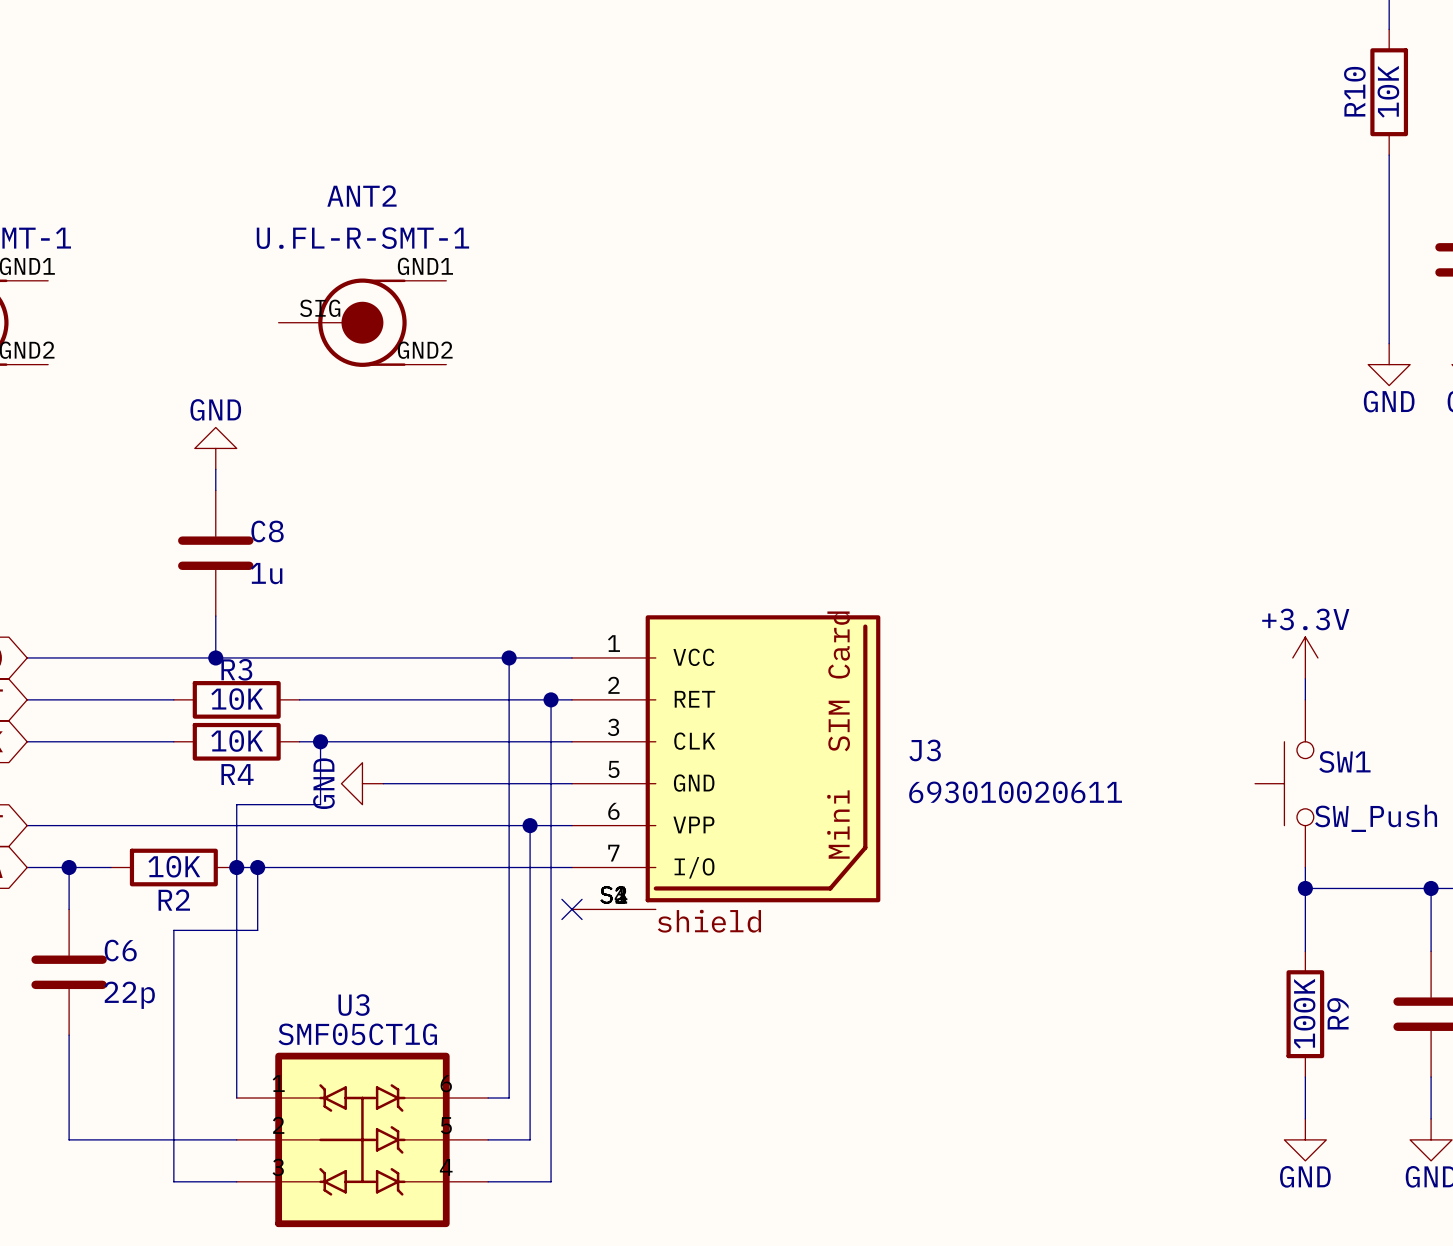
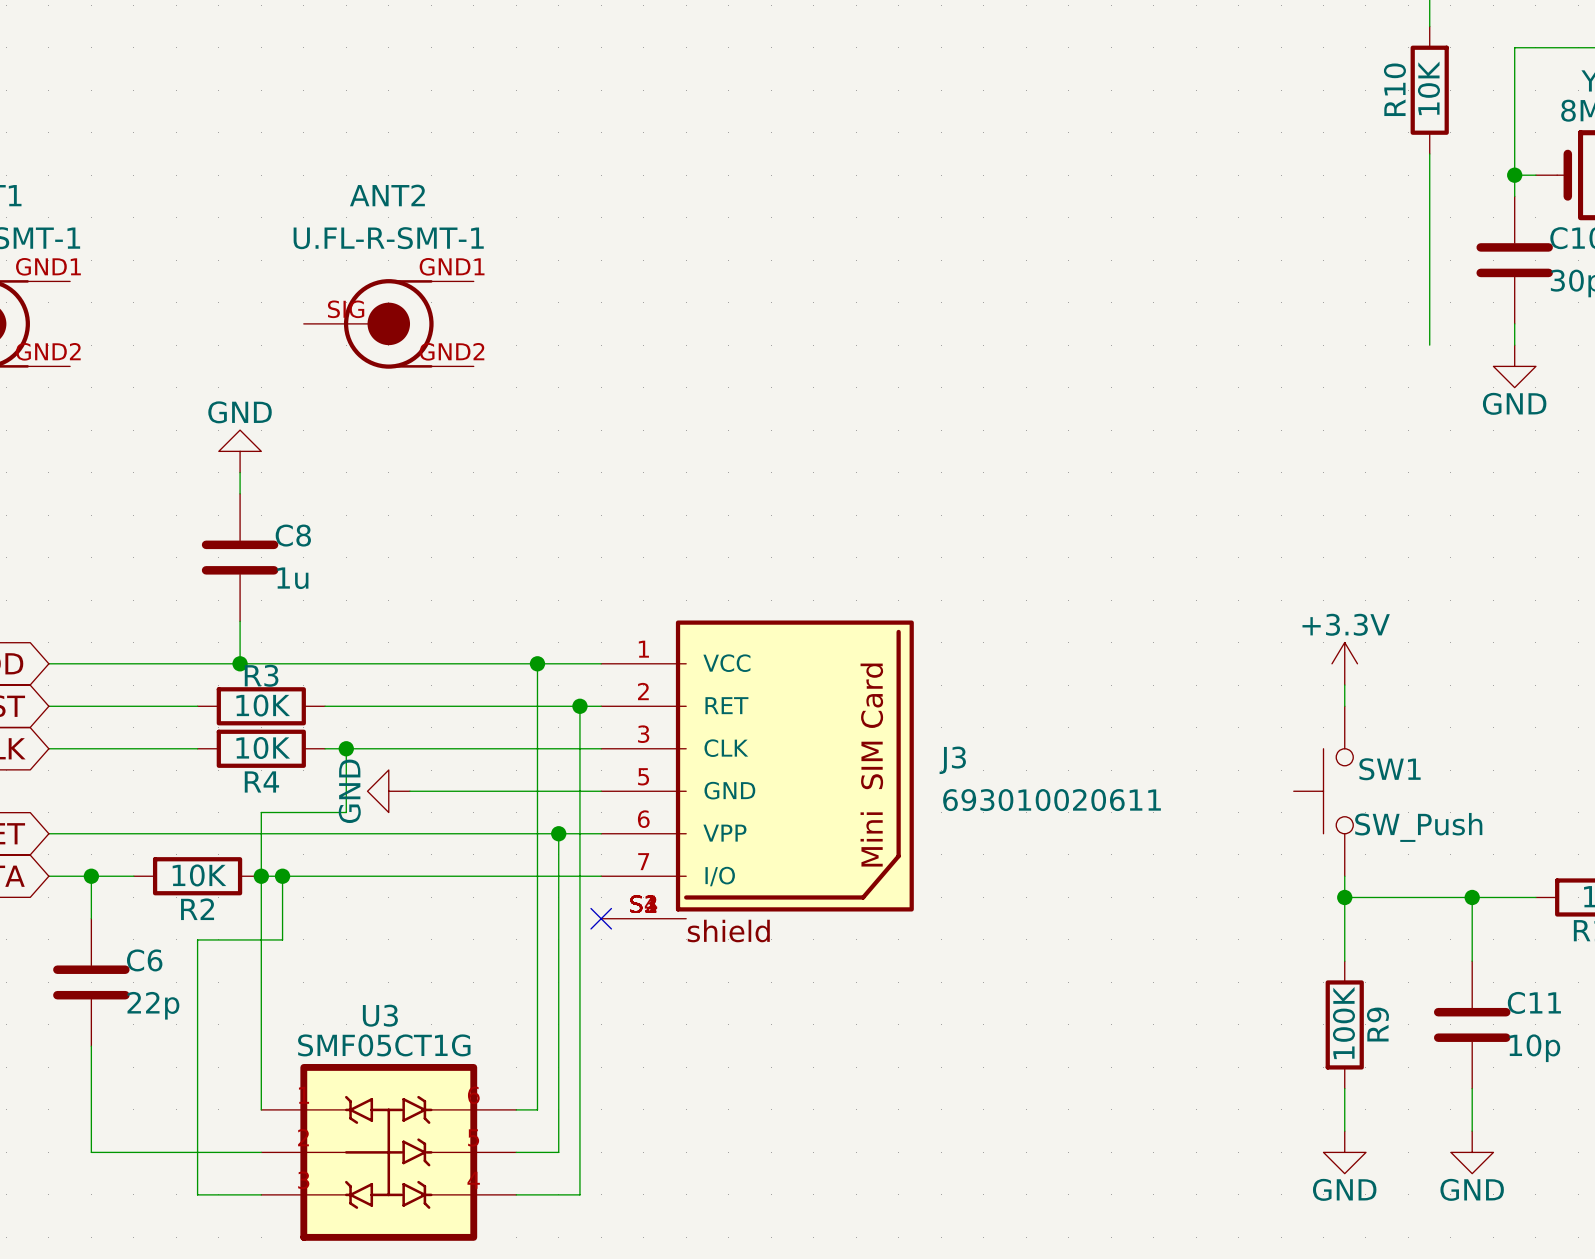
power symbol: GND (1389, 364) -> none

